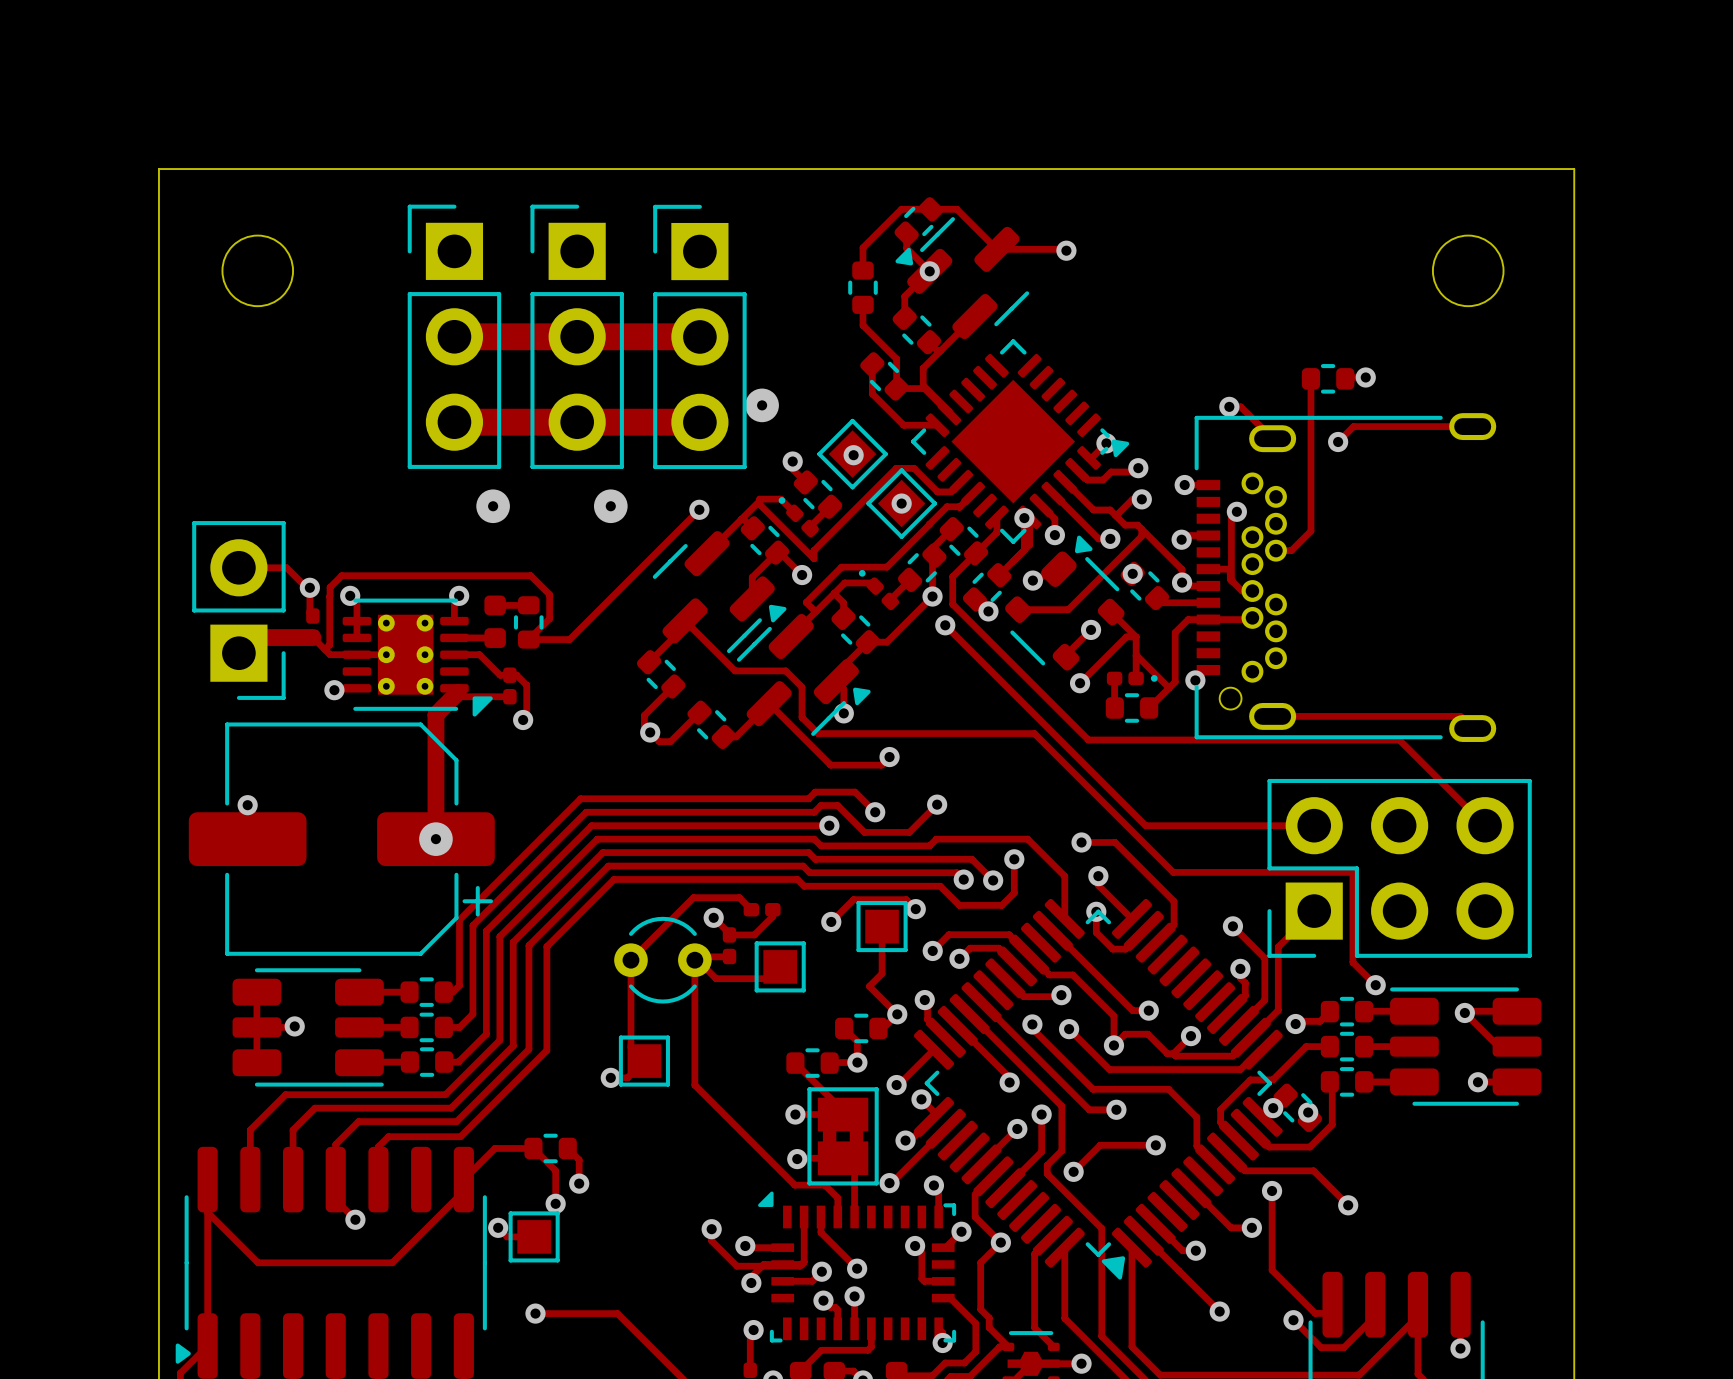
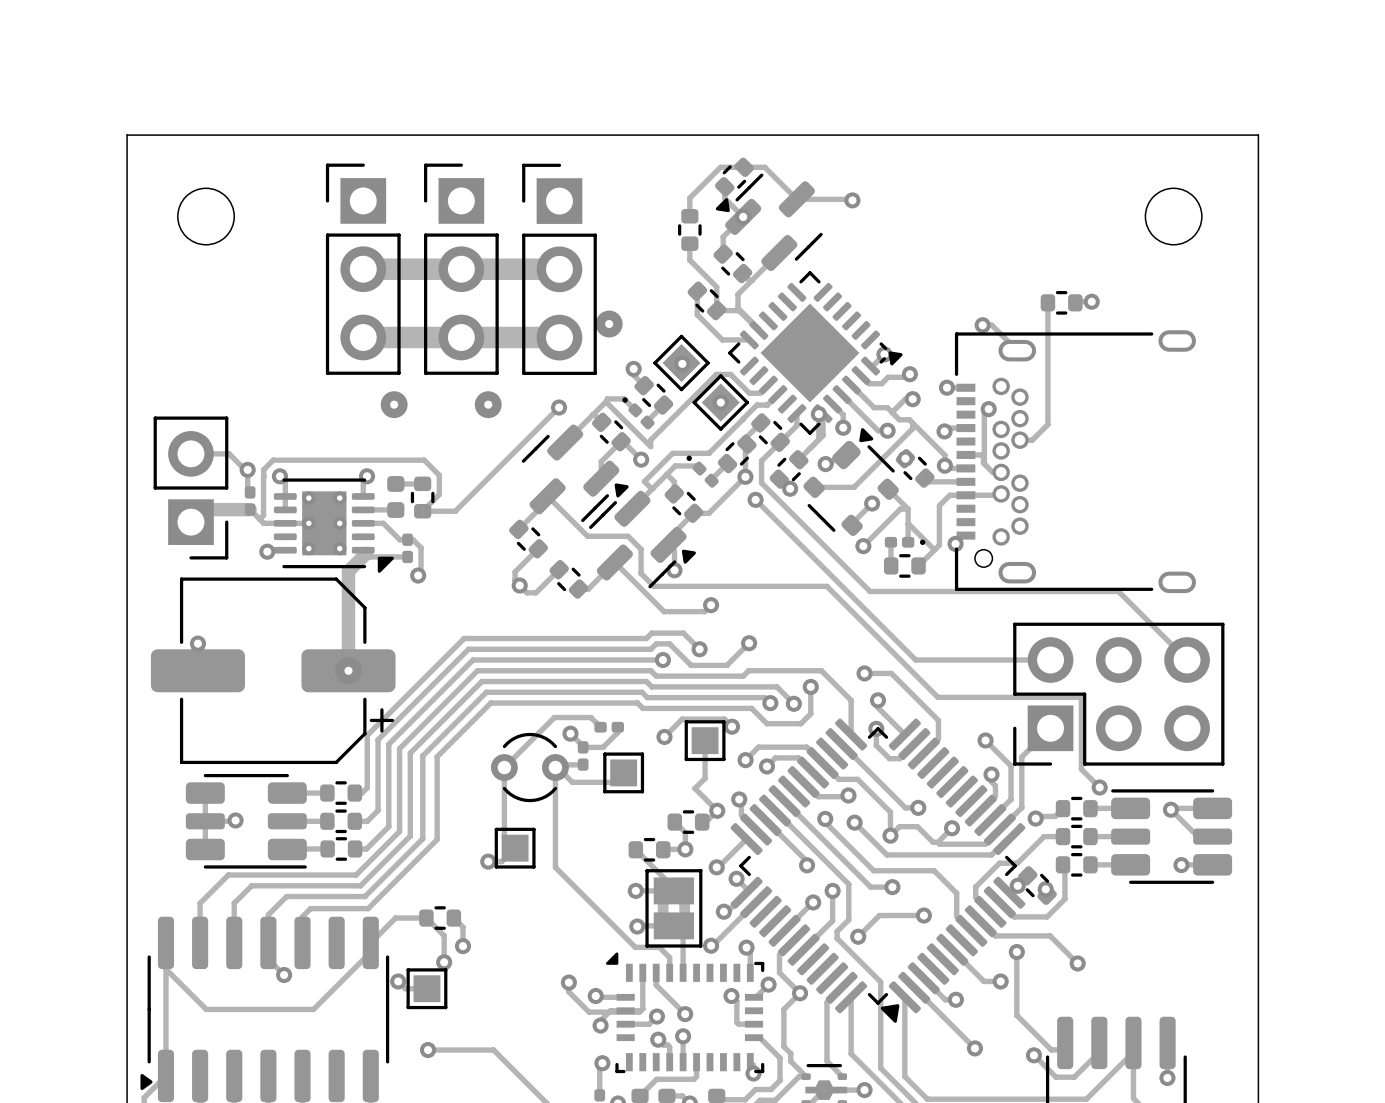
track: (1472, 426) (1353, 426) (1338, 442) -> none
via: (1338, 442) -> none
track: (1272, 716) (1460, 716) (1472, 728) -> none

